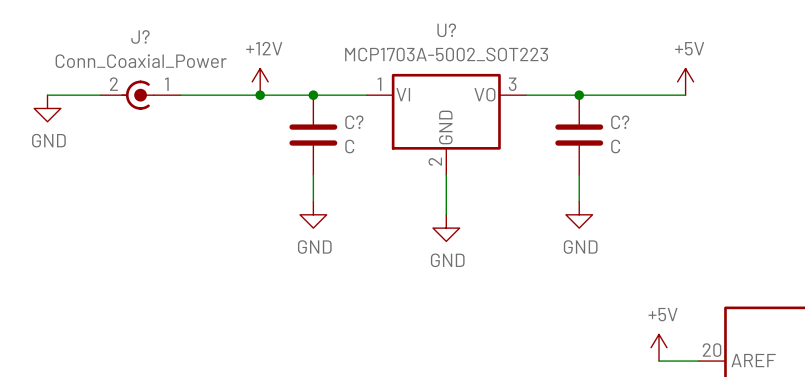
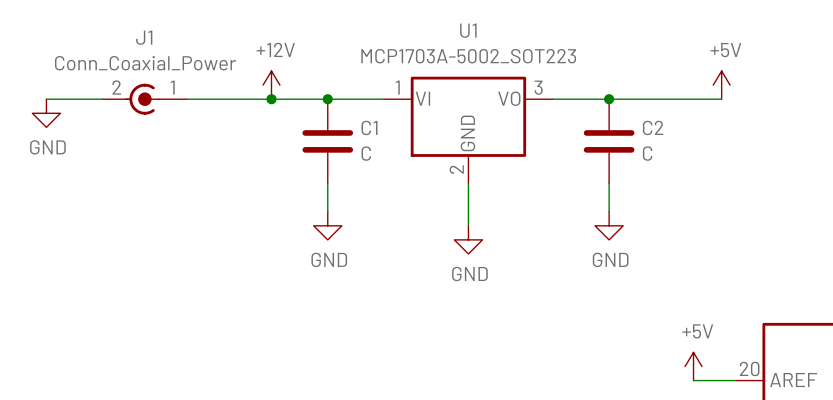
U? name: U? (446, 30) -> U1 (468, 30)
J? name: J? (140, 36) -> J1 (144, 37)
C? name: C? (354, 122) -> C1 (369, 127)
C? name: C? (620, 122) -> C2 (653, 127)

